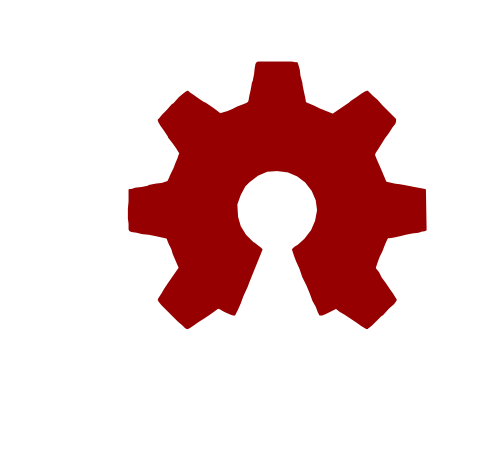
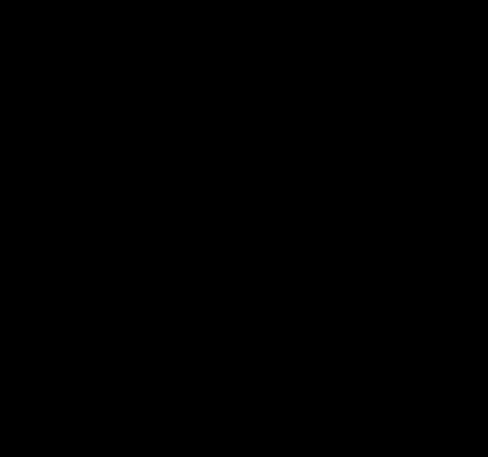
power symbol: (277, 195) -> none

